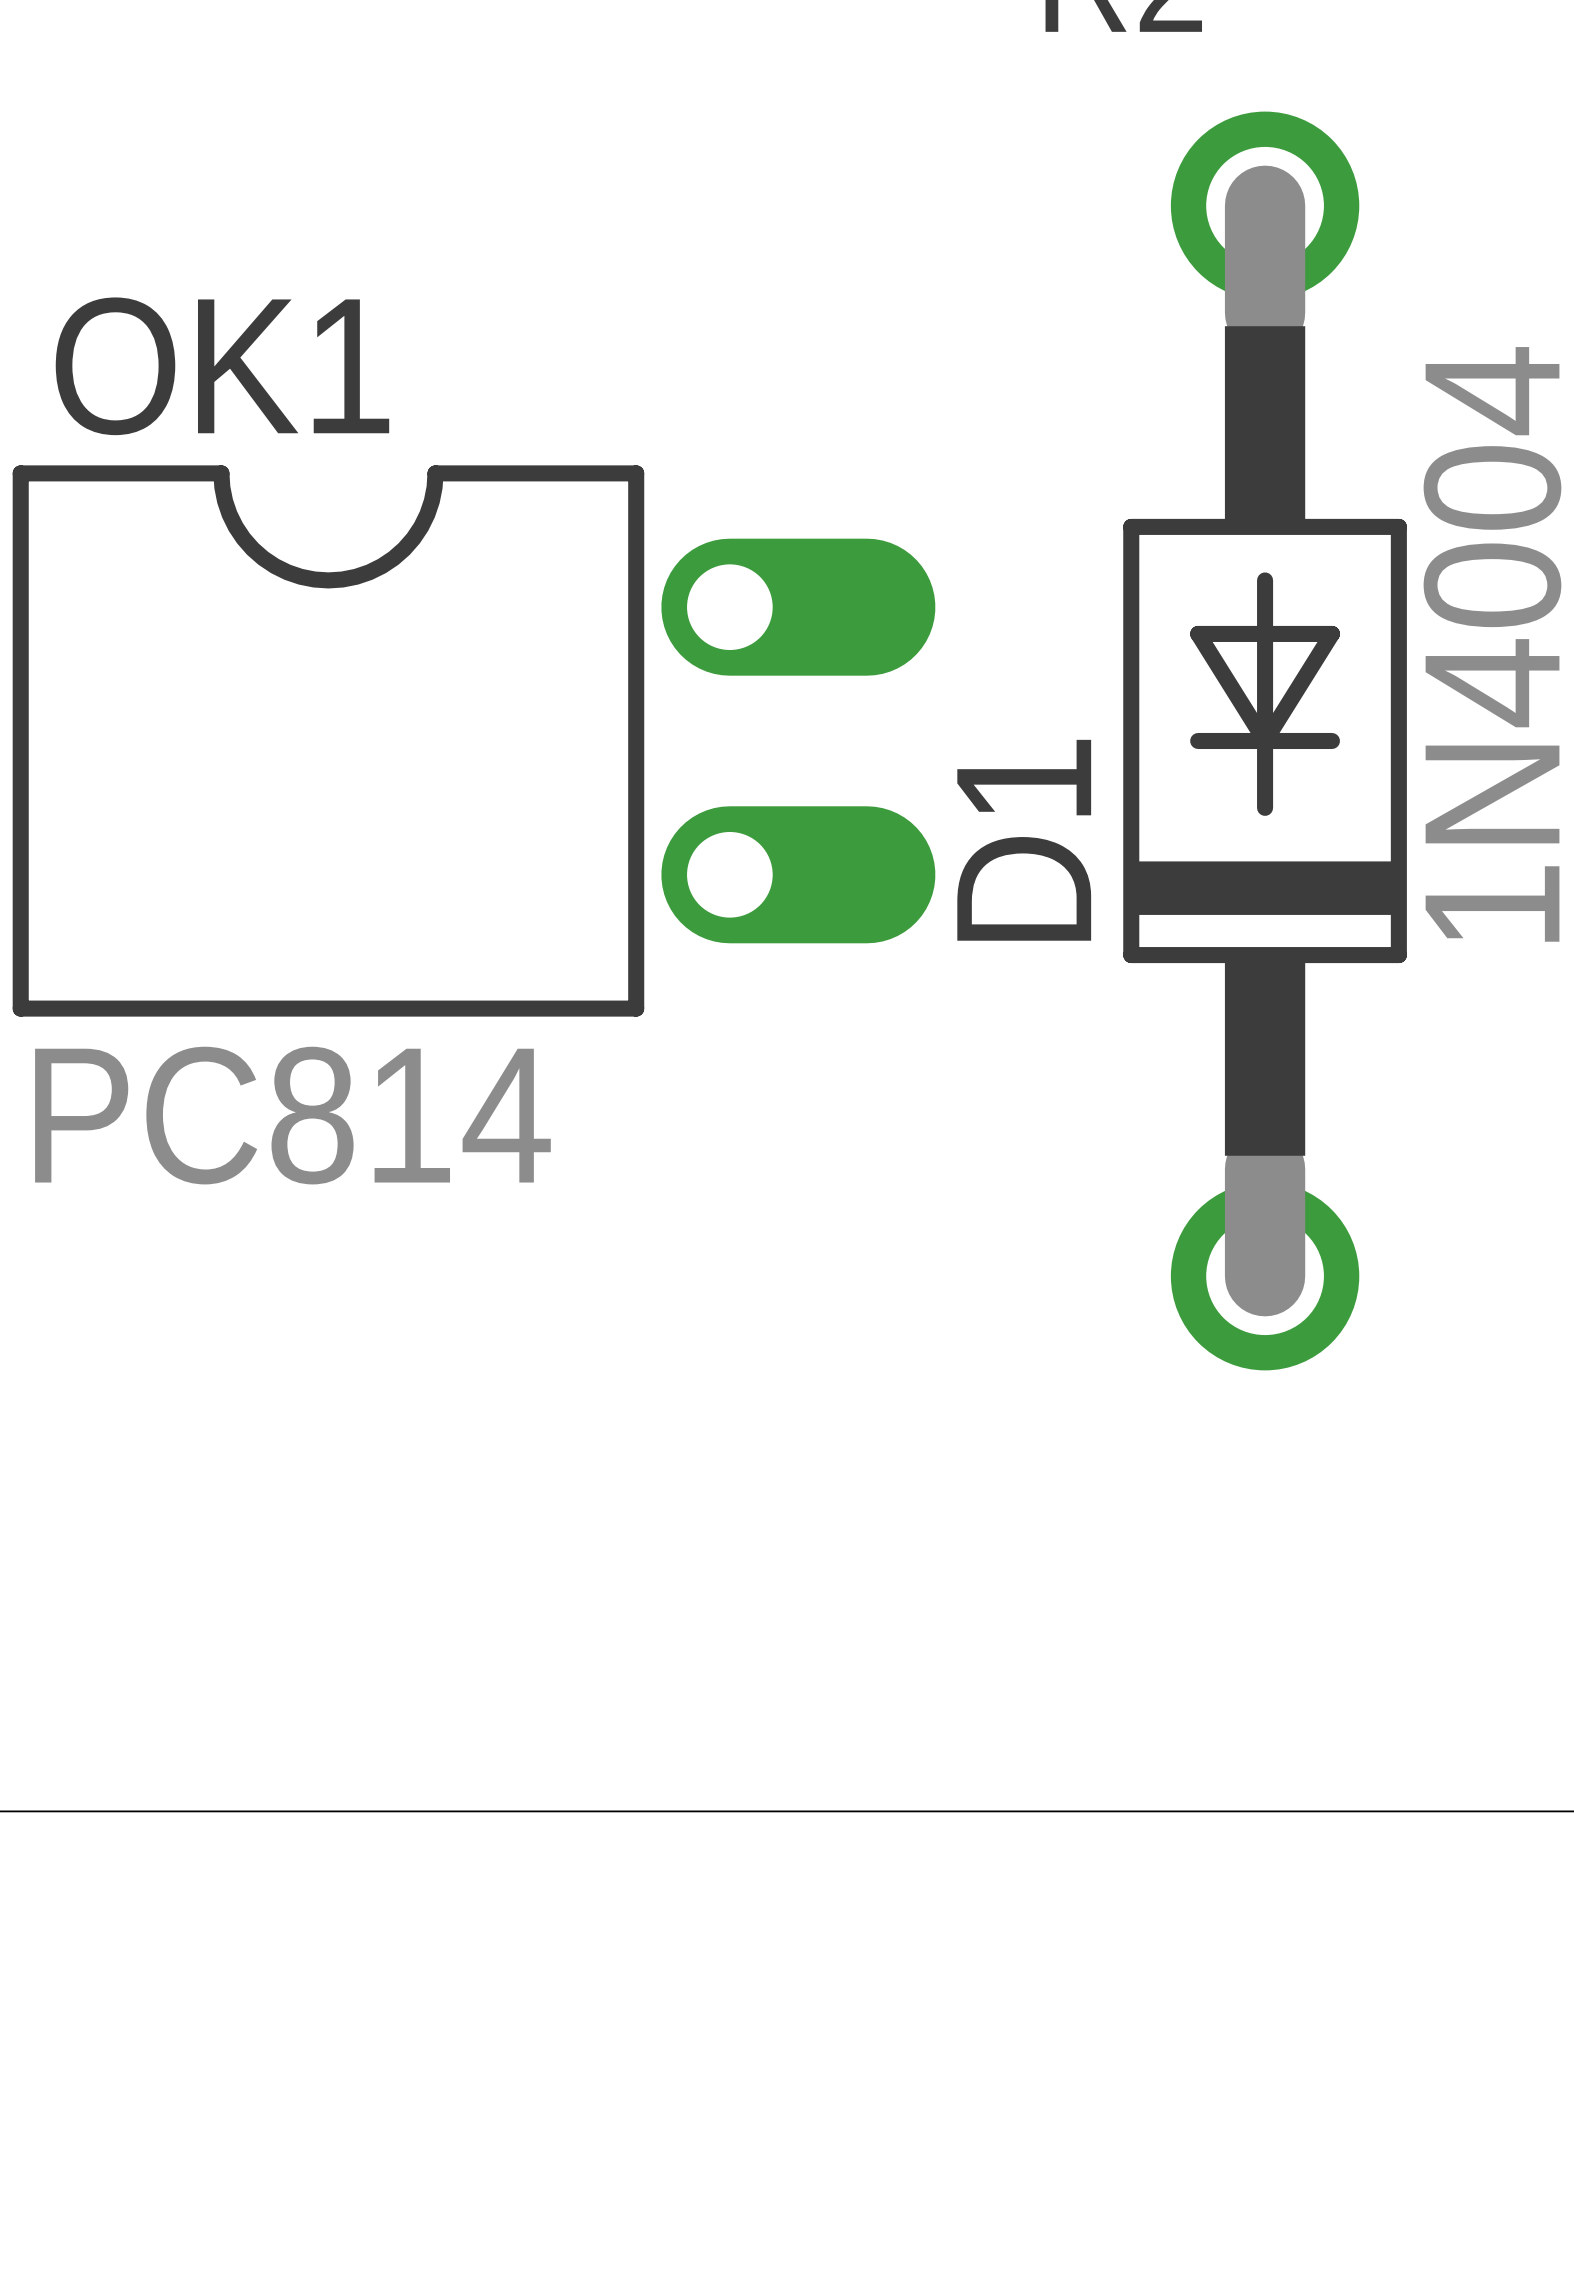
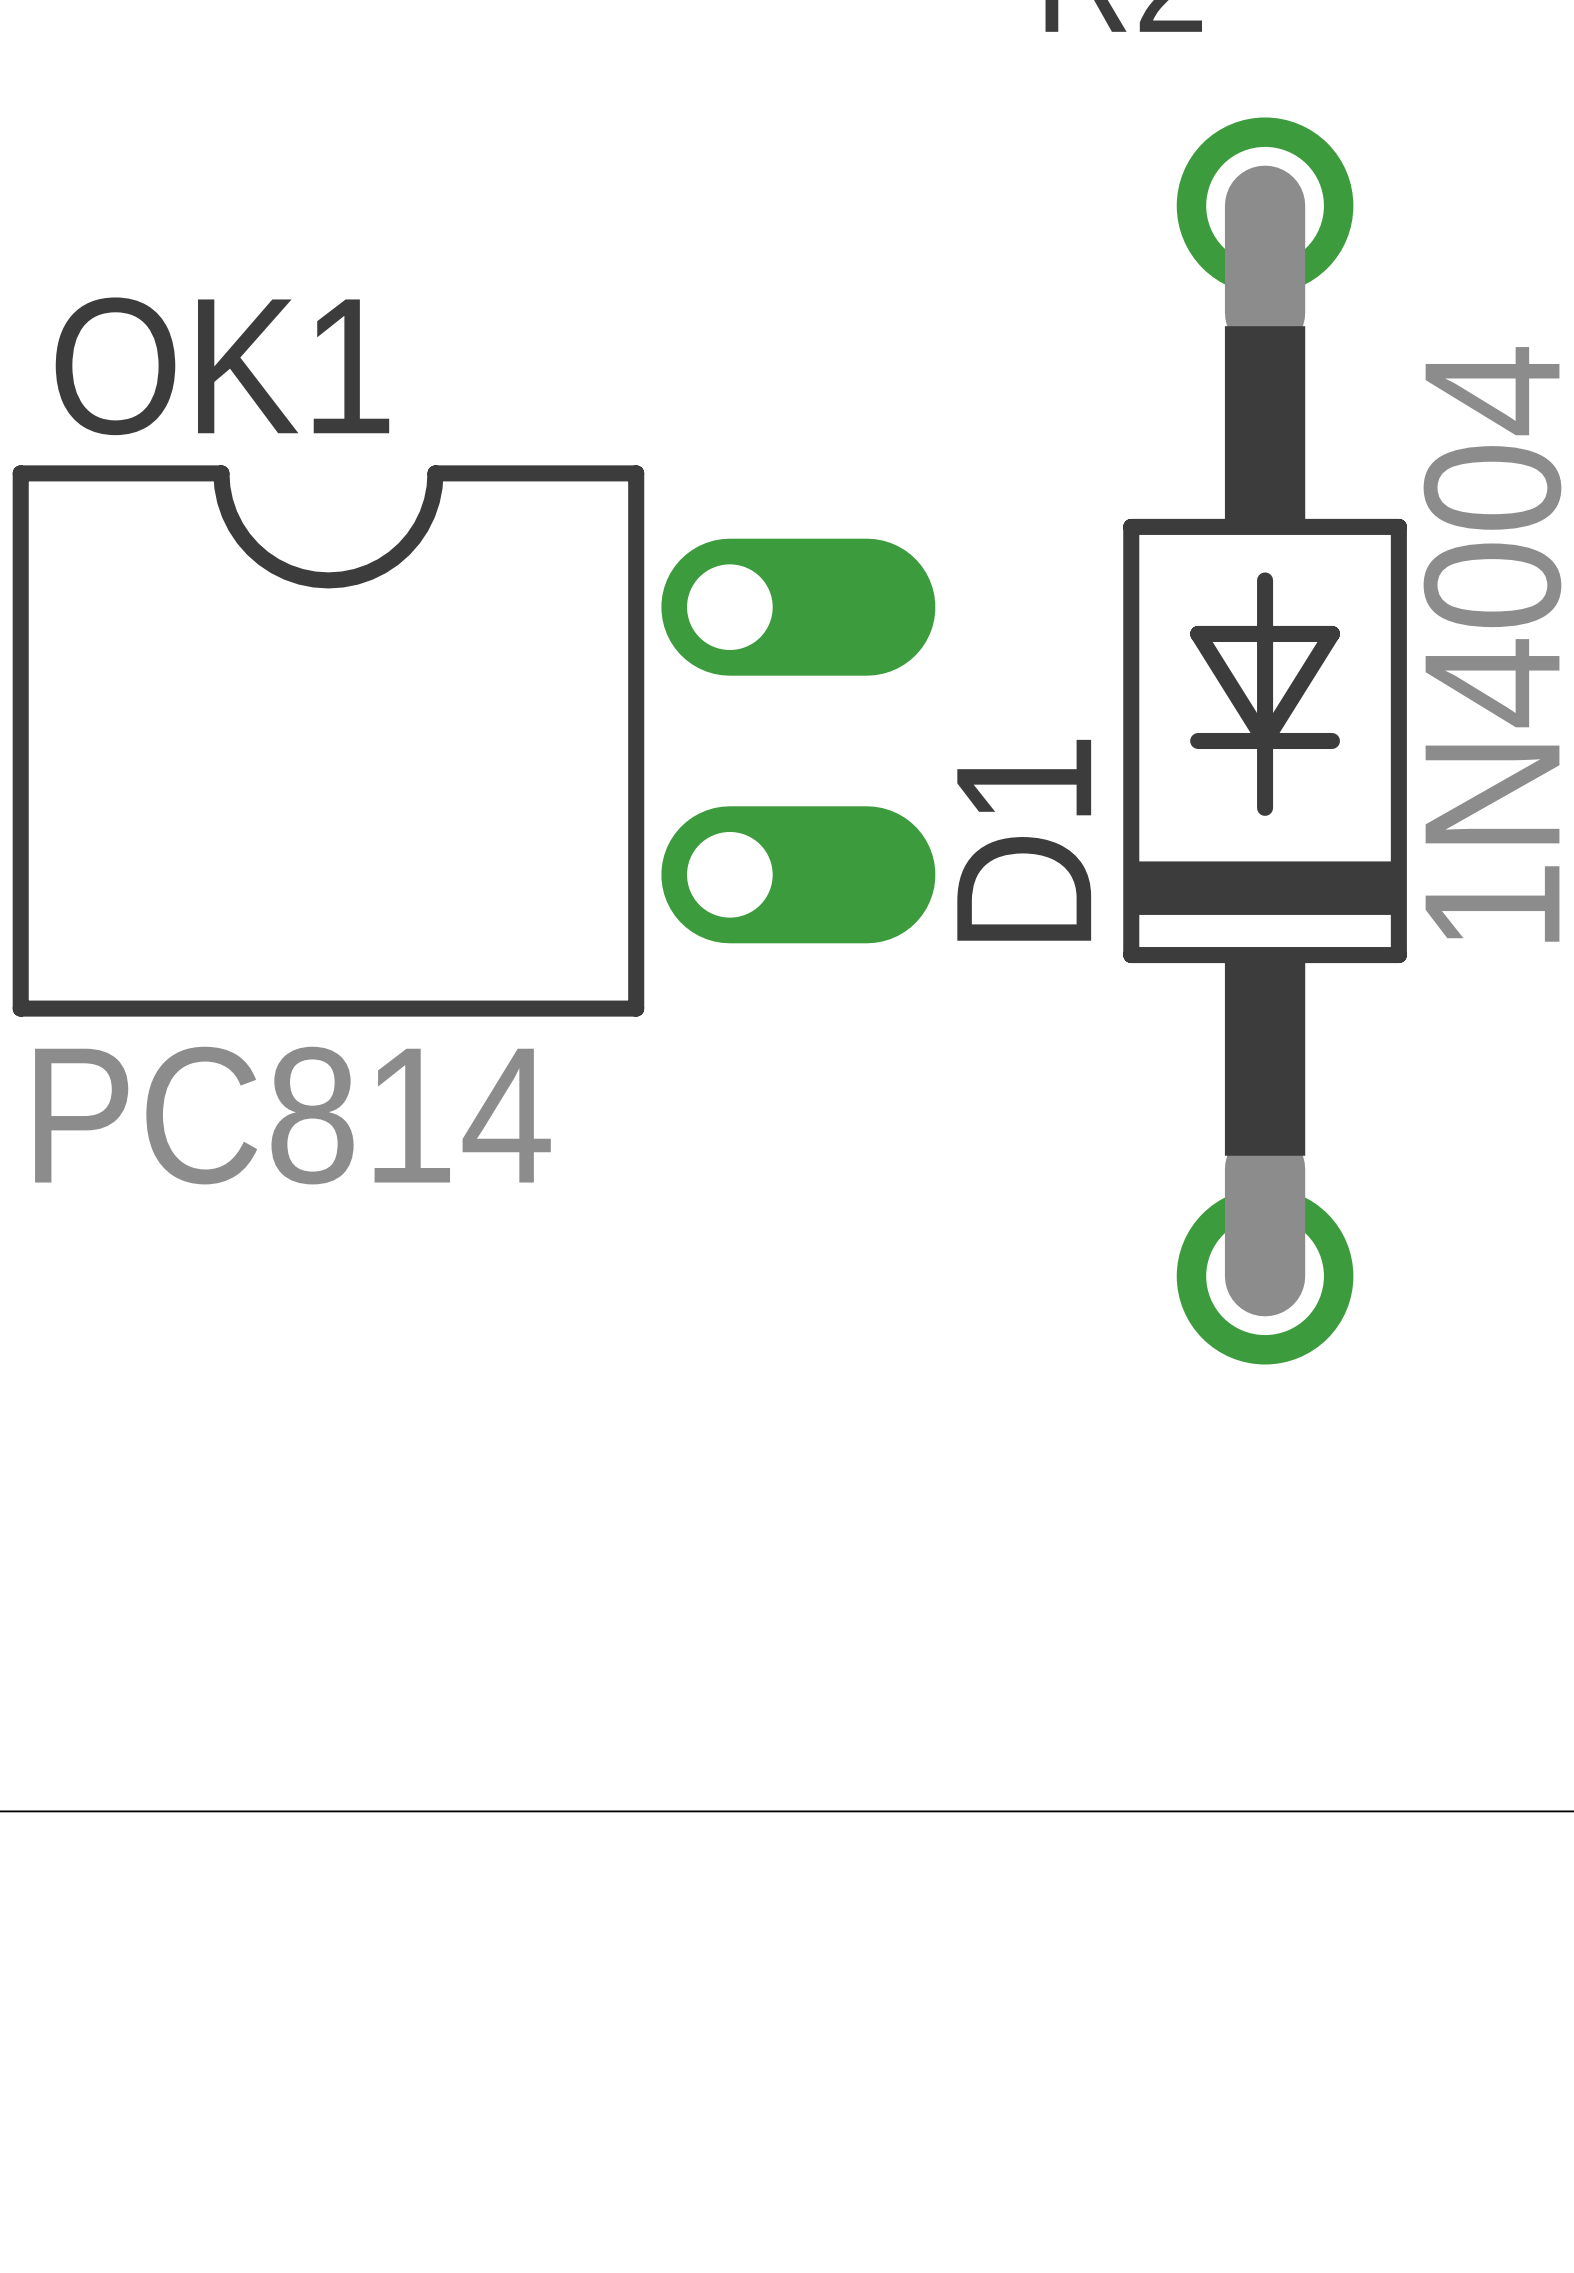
D1 footprint: [1123, 111, 1407, 1371] -> [1123, 117, 1407, 1365]

